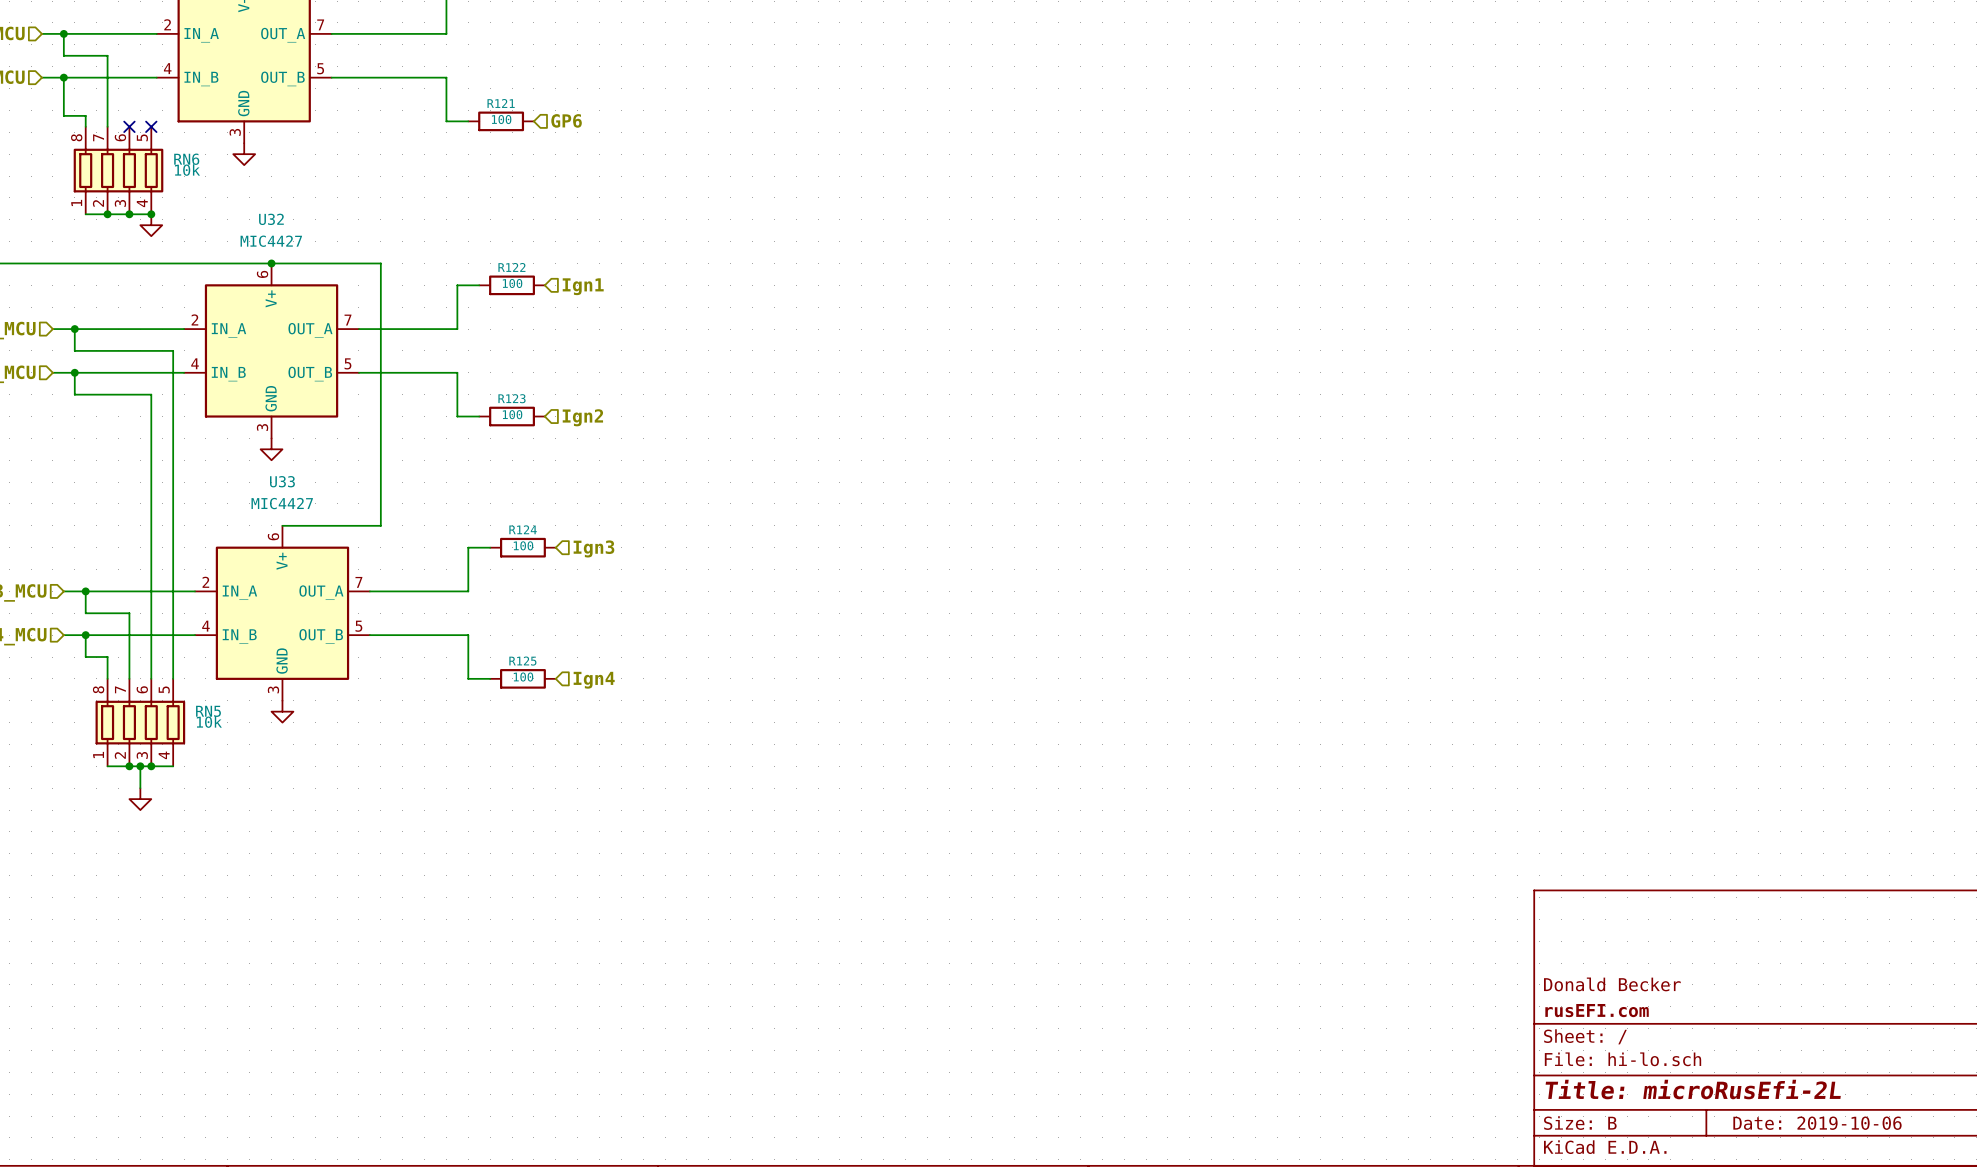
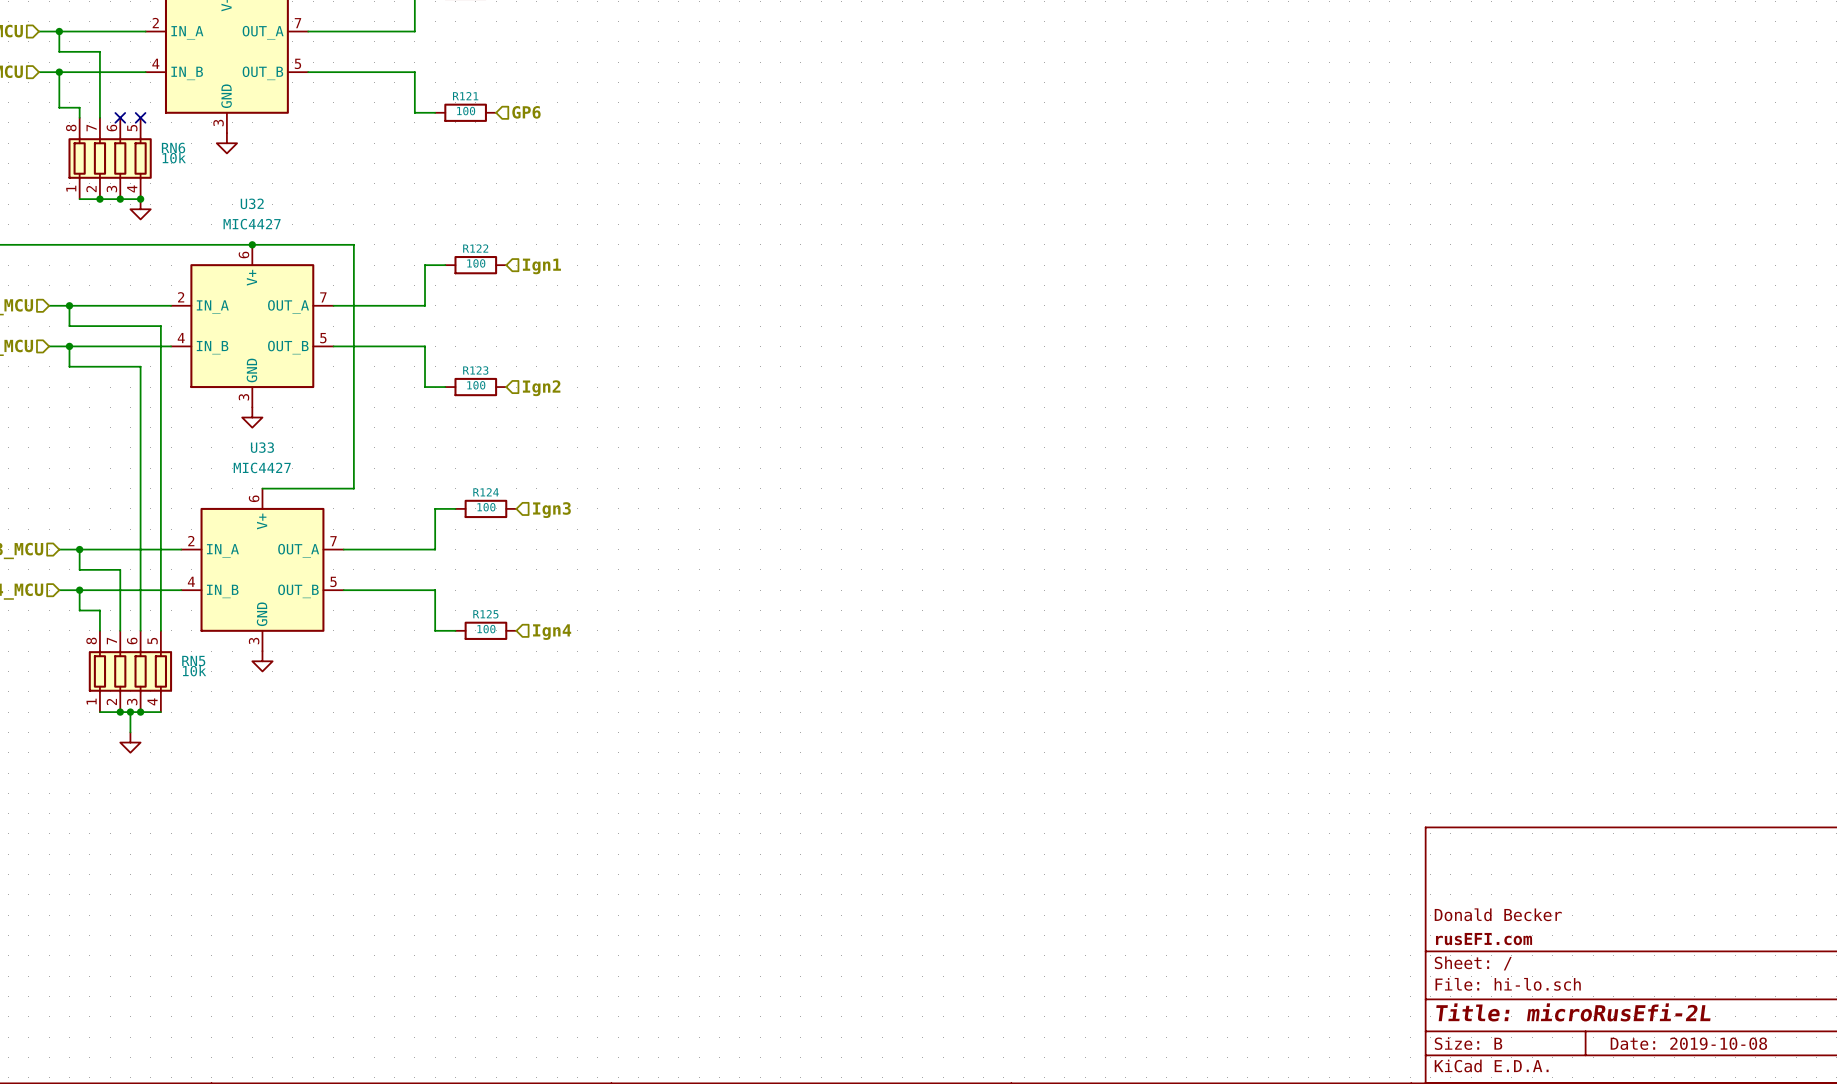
title block: Date: 2019-10-06 (1817, 1123) -> Date: 2019-10-08 (1688, 1043)

